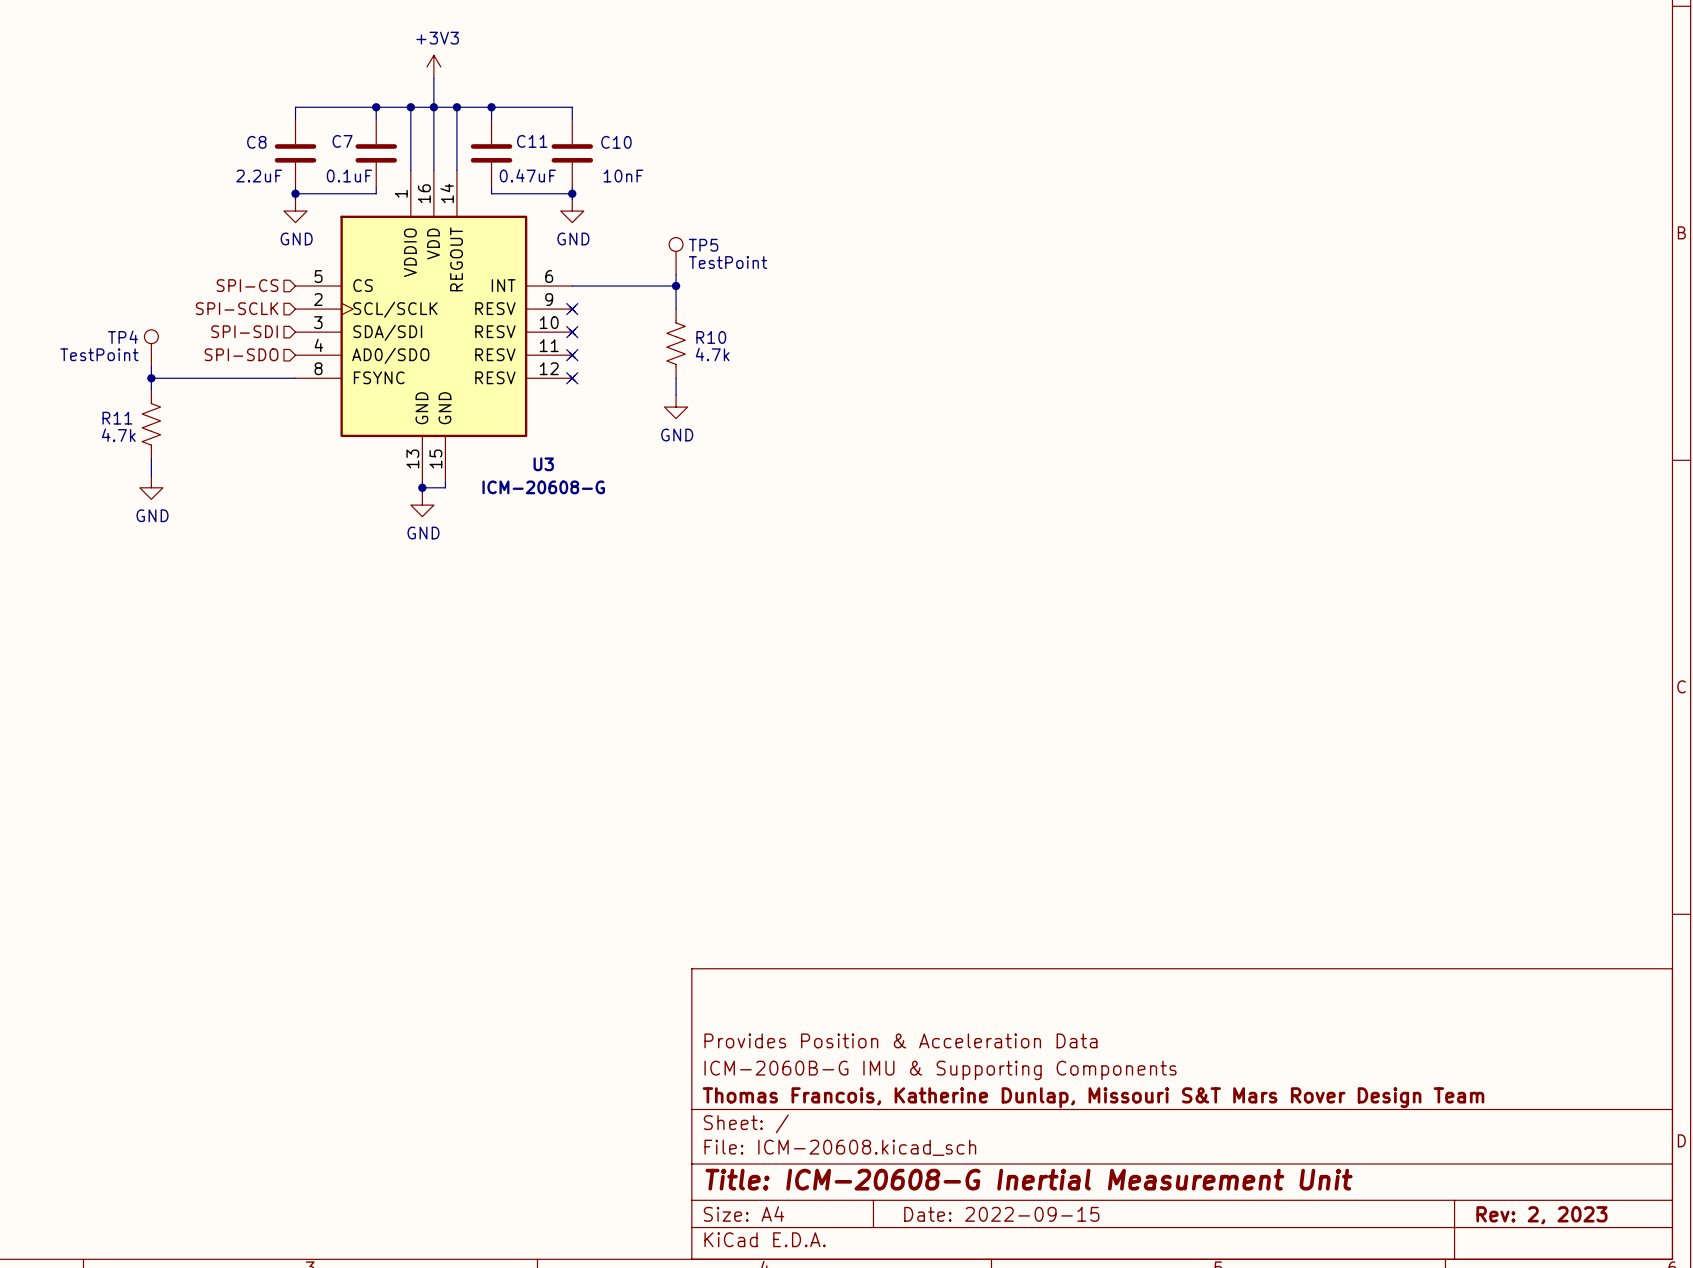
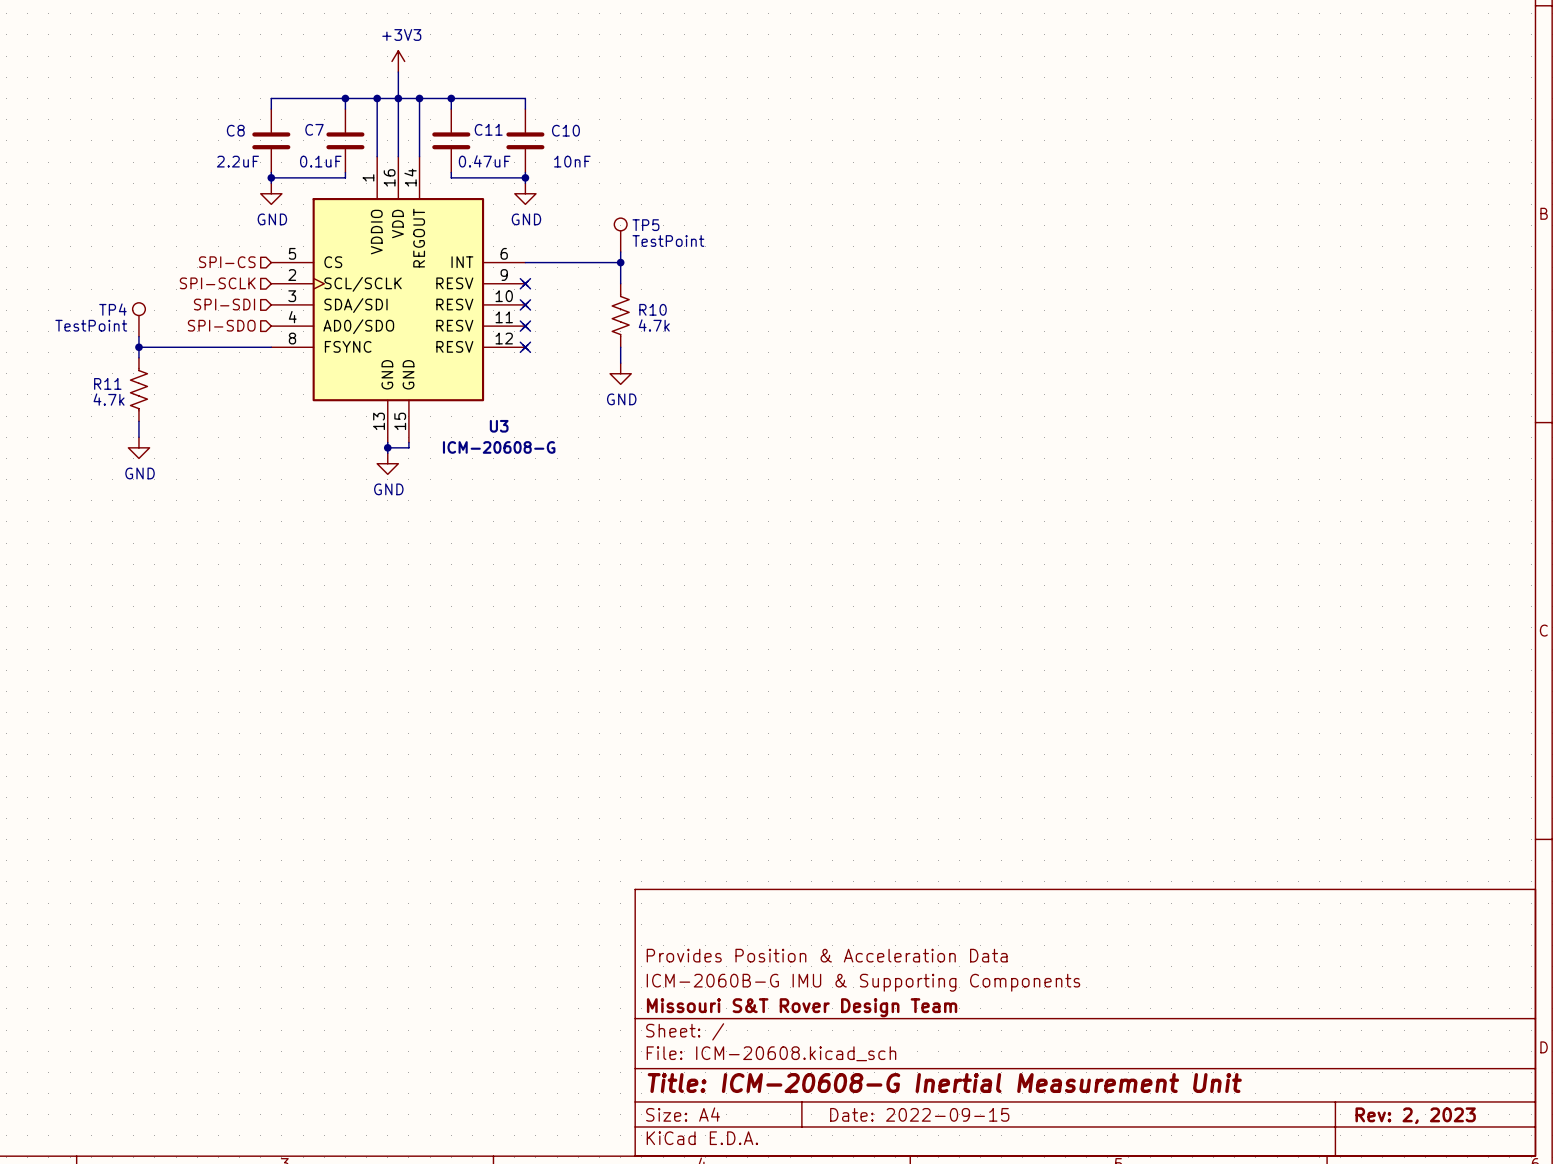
title block: Thomas Francois, Katherine Dunlap, Missouri S&T Mars Rover Design Team (1093, 1097) -> Missouri S&T Rover Design Team (802, 1007)

